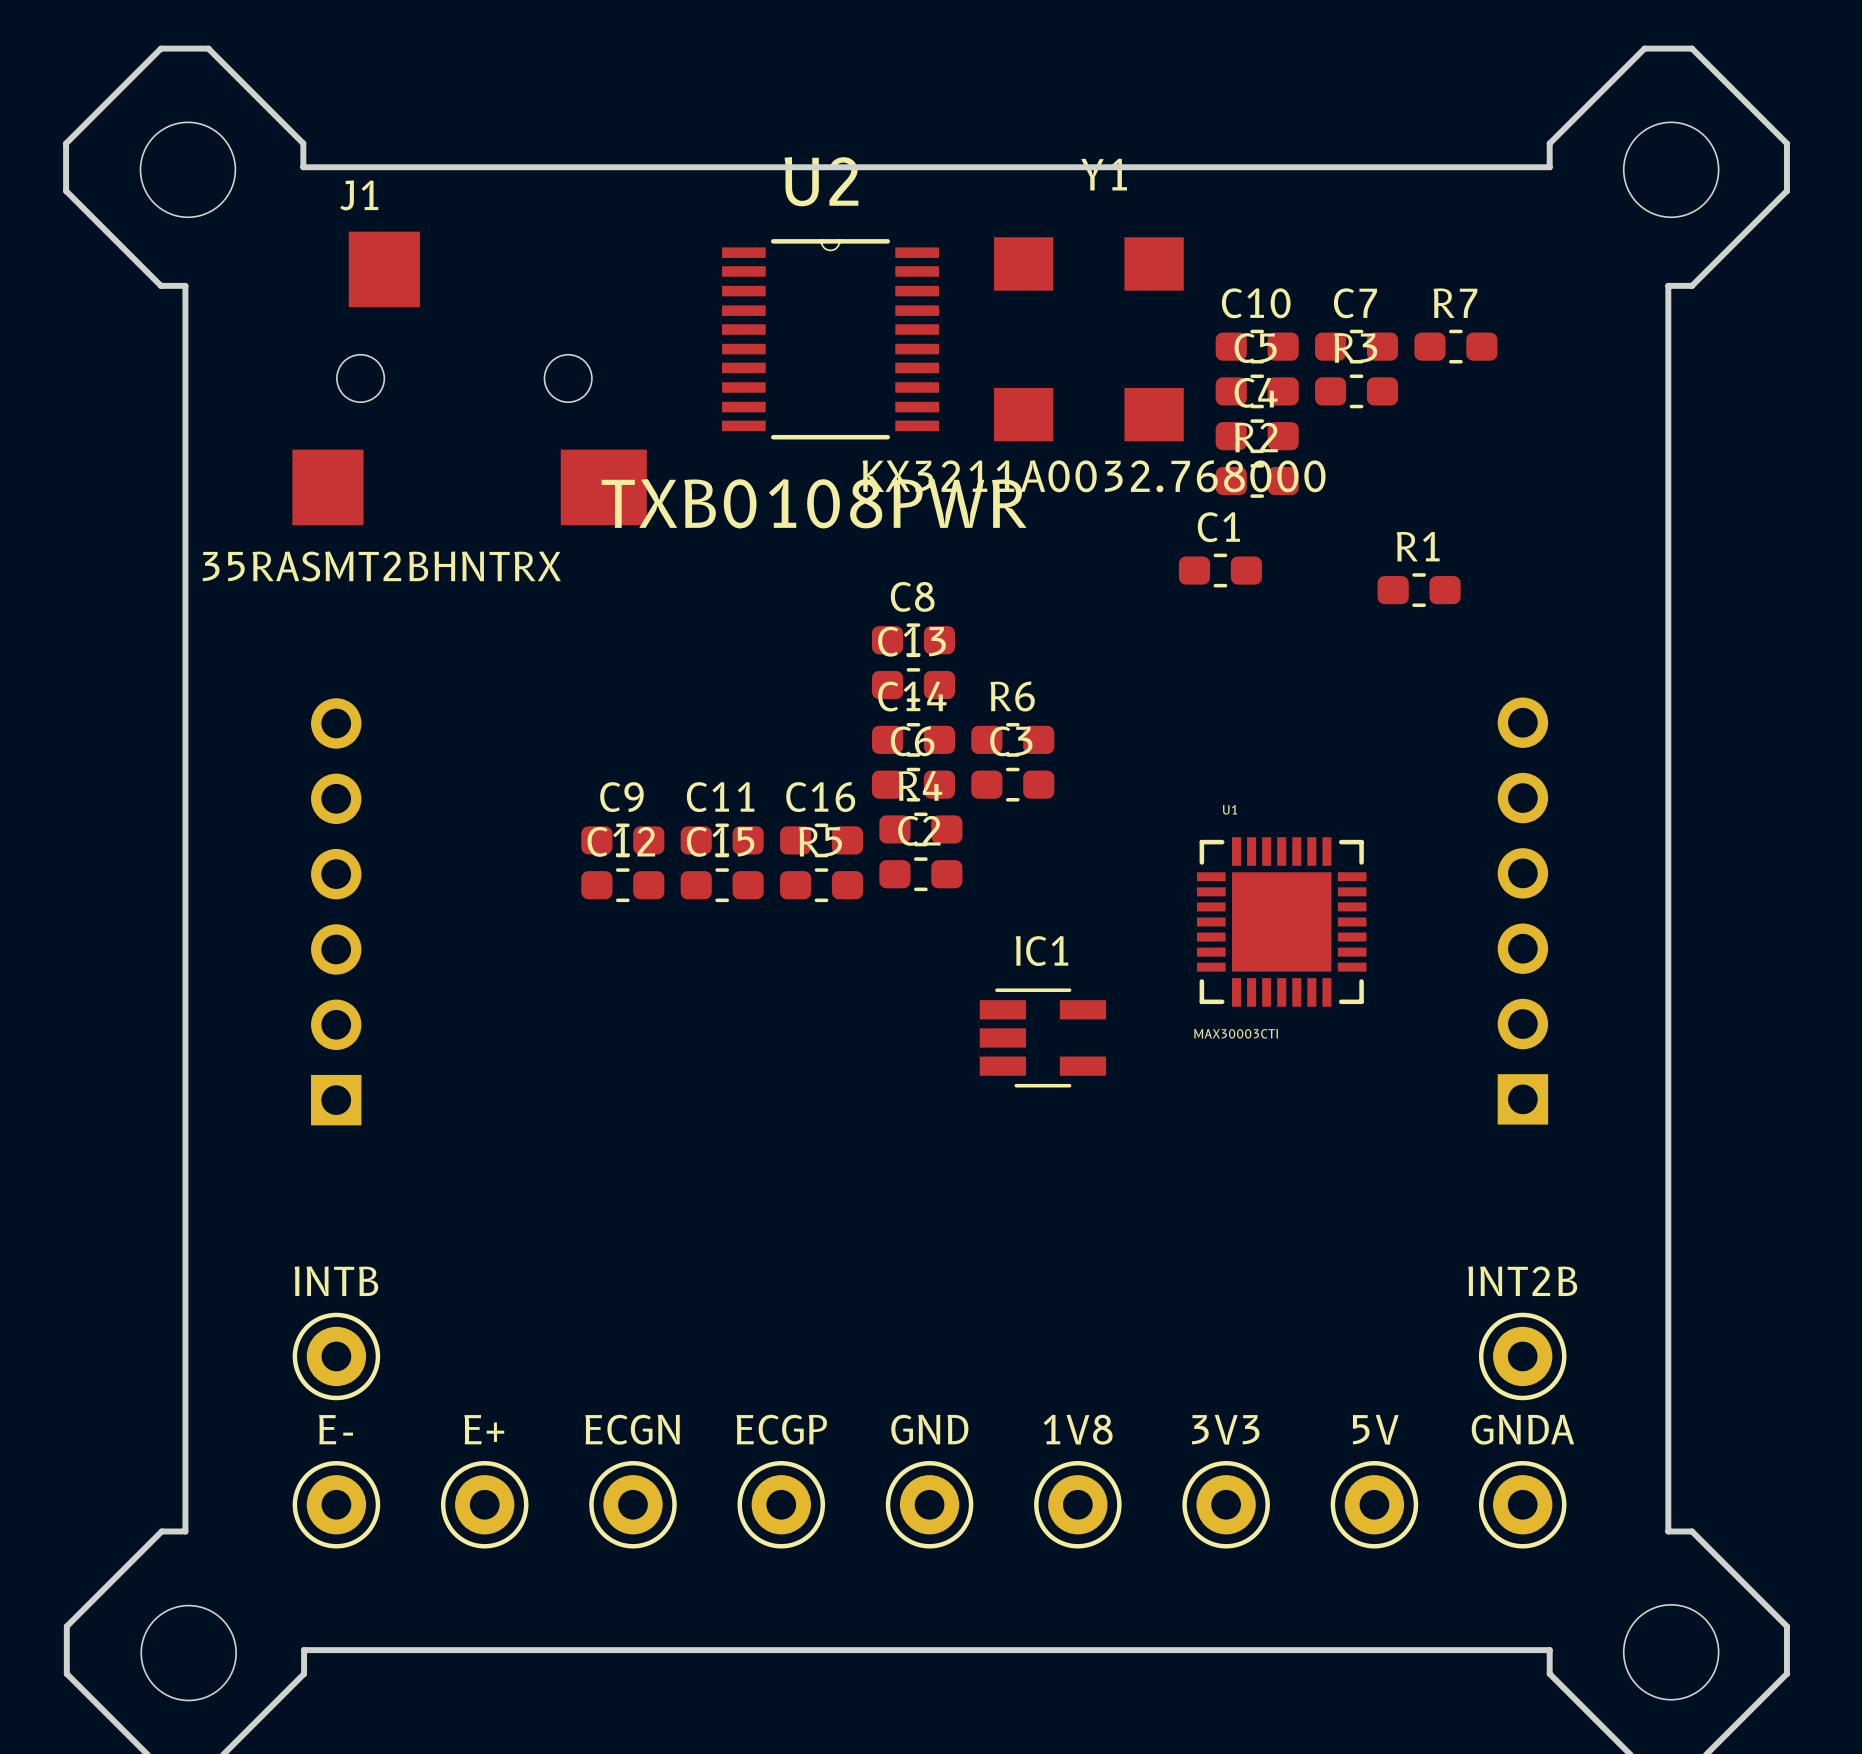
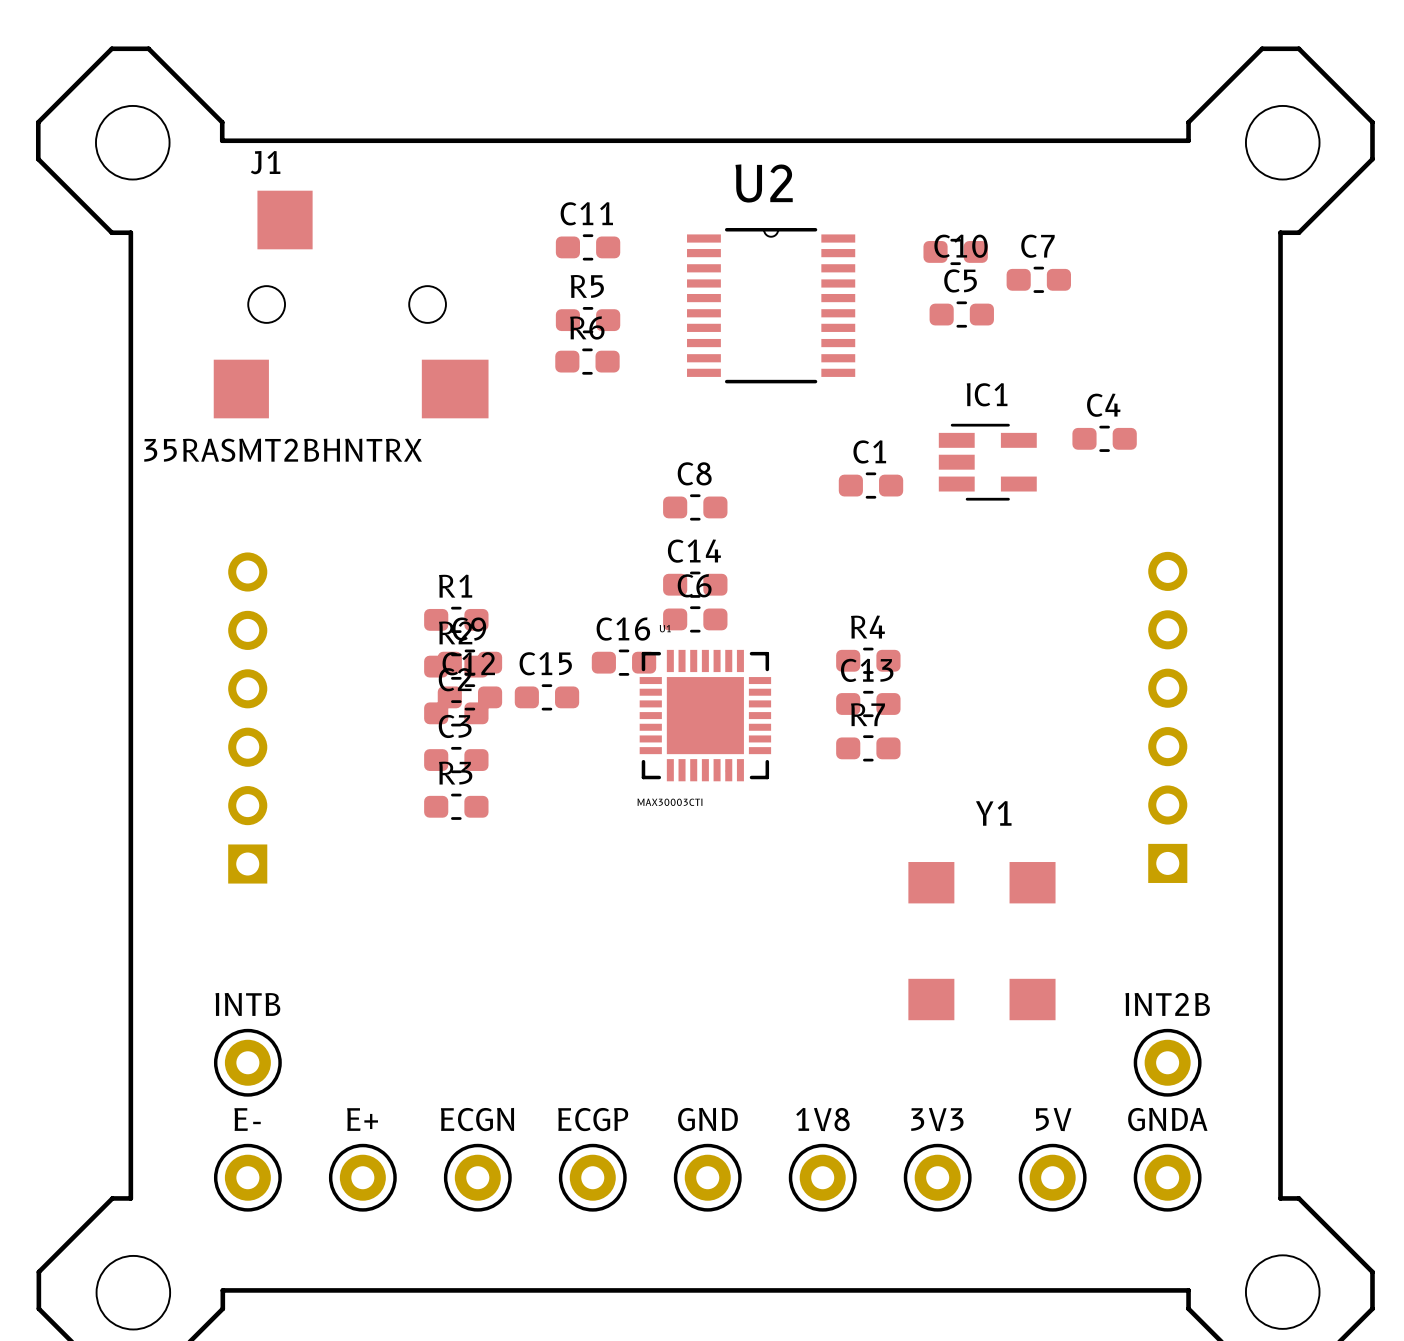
U2 position: (830, 339) -> (771, 305)
Y1 position: (1088, 339) -> (981, 941)
C10 position: (1257, 346) -> (955, 251)
R7 position: (1455, 346) -> (868, 748)
R3 position: (1356, 391) -> (456, 806)
C4 position: (1257, 436) -> (1104, 438)
Y1 value: KX3211A0032.768000 (1094, 476) -> none
R2 position: (1257, 480) -> (456, 666)
U2 value: TXB0108PWR (814, 503) -> none
C1 position: (1220, 570) -> (870, 485)
R1 position: (1419, 590) -> (456, 619)
C13 position: (913, 685) -> (868, 703)
R6 position: (1012, 739) -> (587, 361)
C3 position: (1012, 784) -> (456, 760)
R4 position: (920, 829) -> (868, 660)
C11 position: (722, 840) -> (588, 247)
C2 position: (920, 874) -> (456, 713)
R5 position: (821, 885) -> (588, 320)
U1 position: (1281, 921) -> (705, 715)
IC1 position: (1042, 1037) -> (987, 462)

